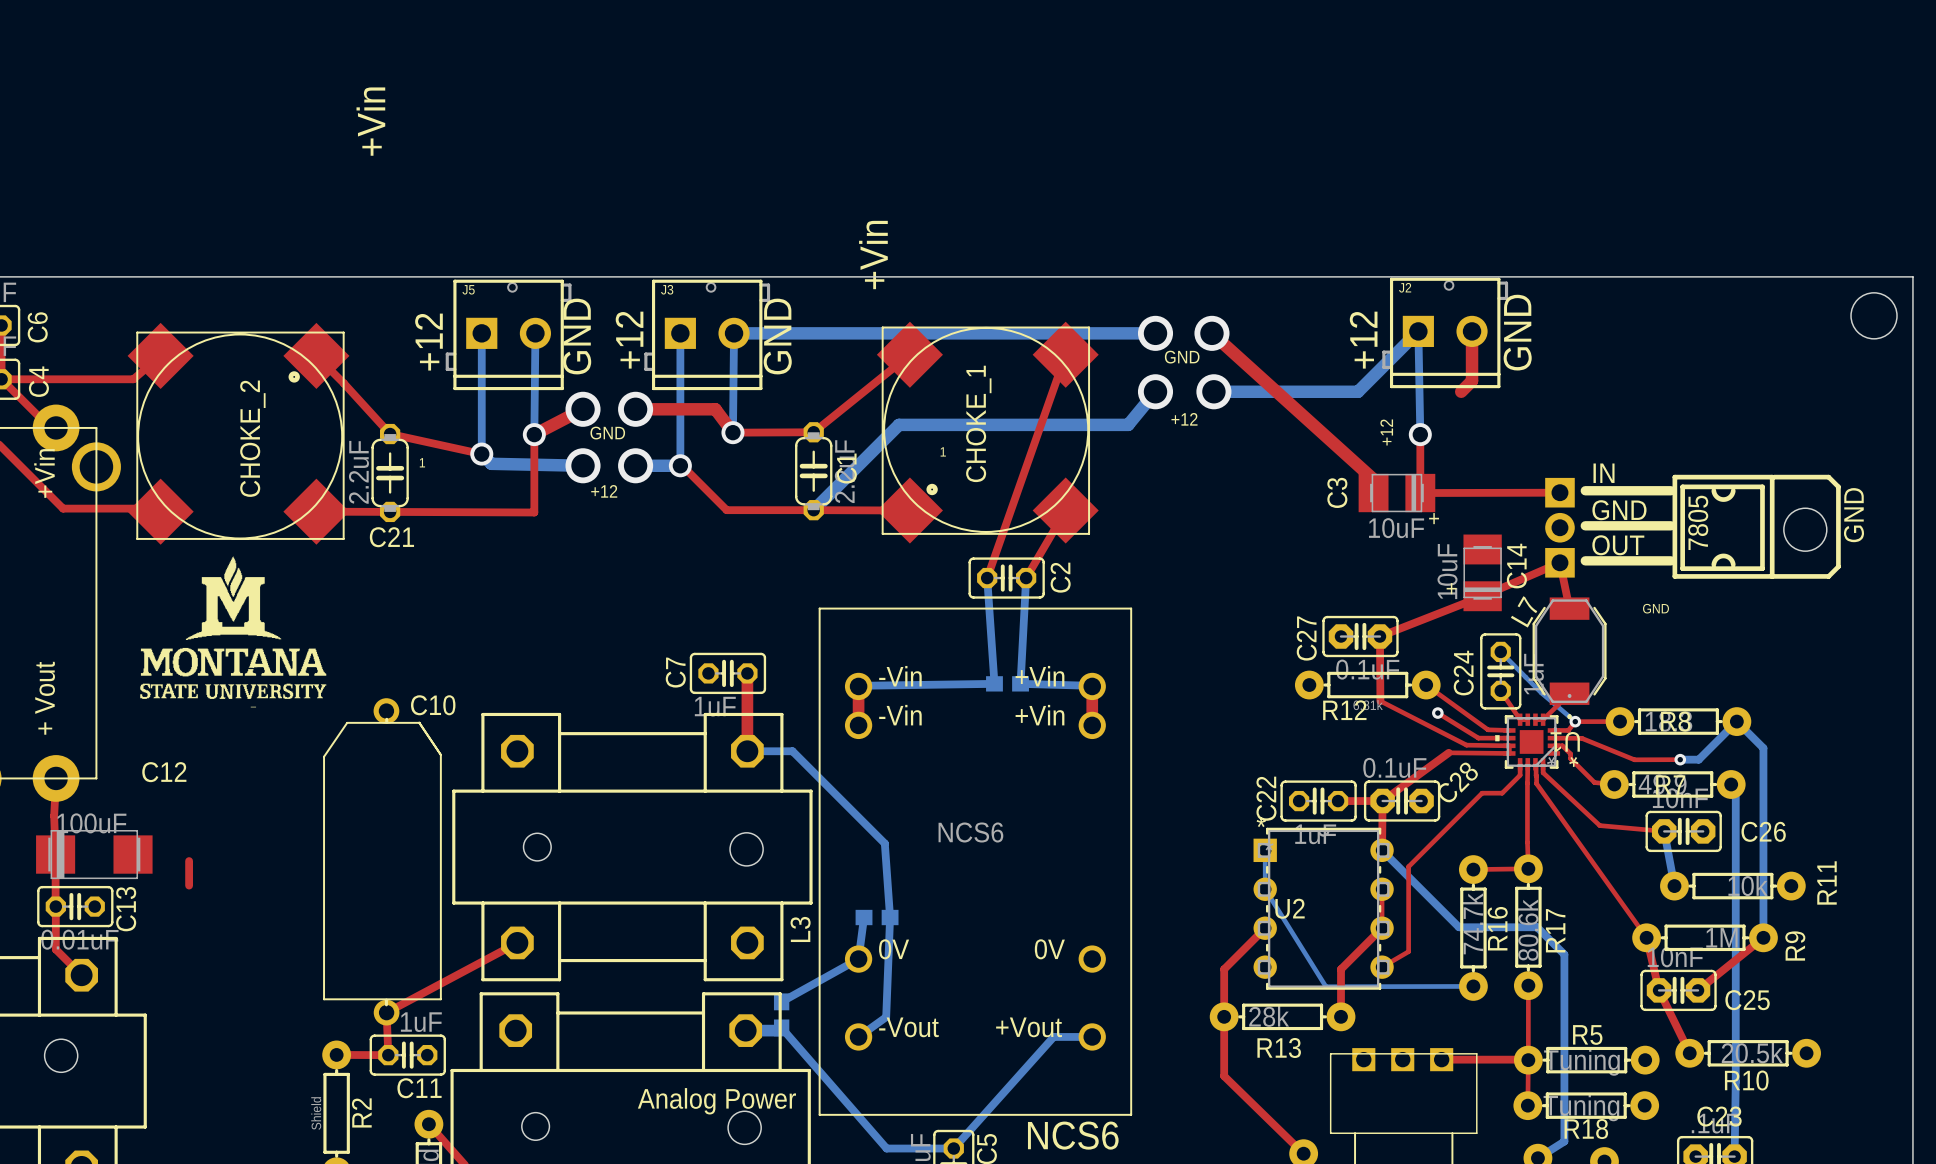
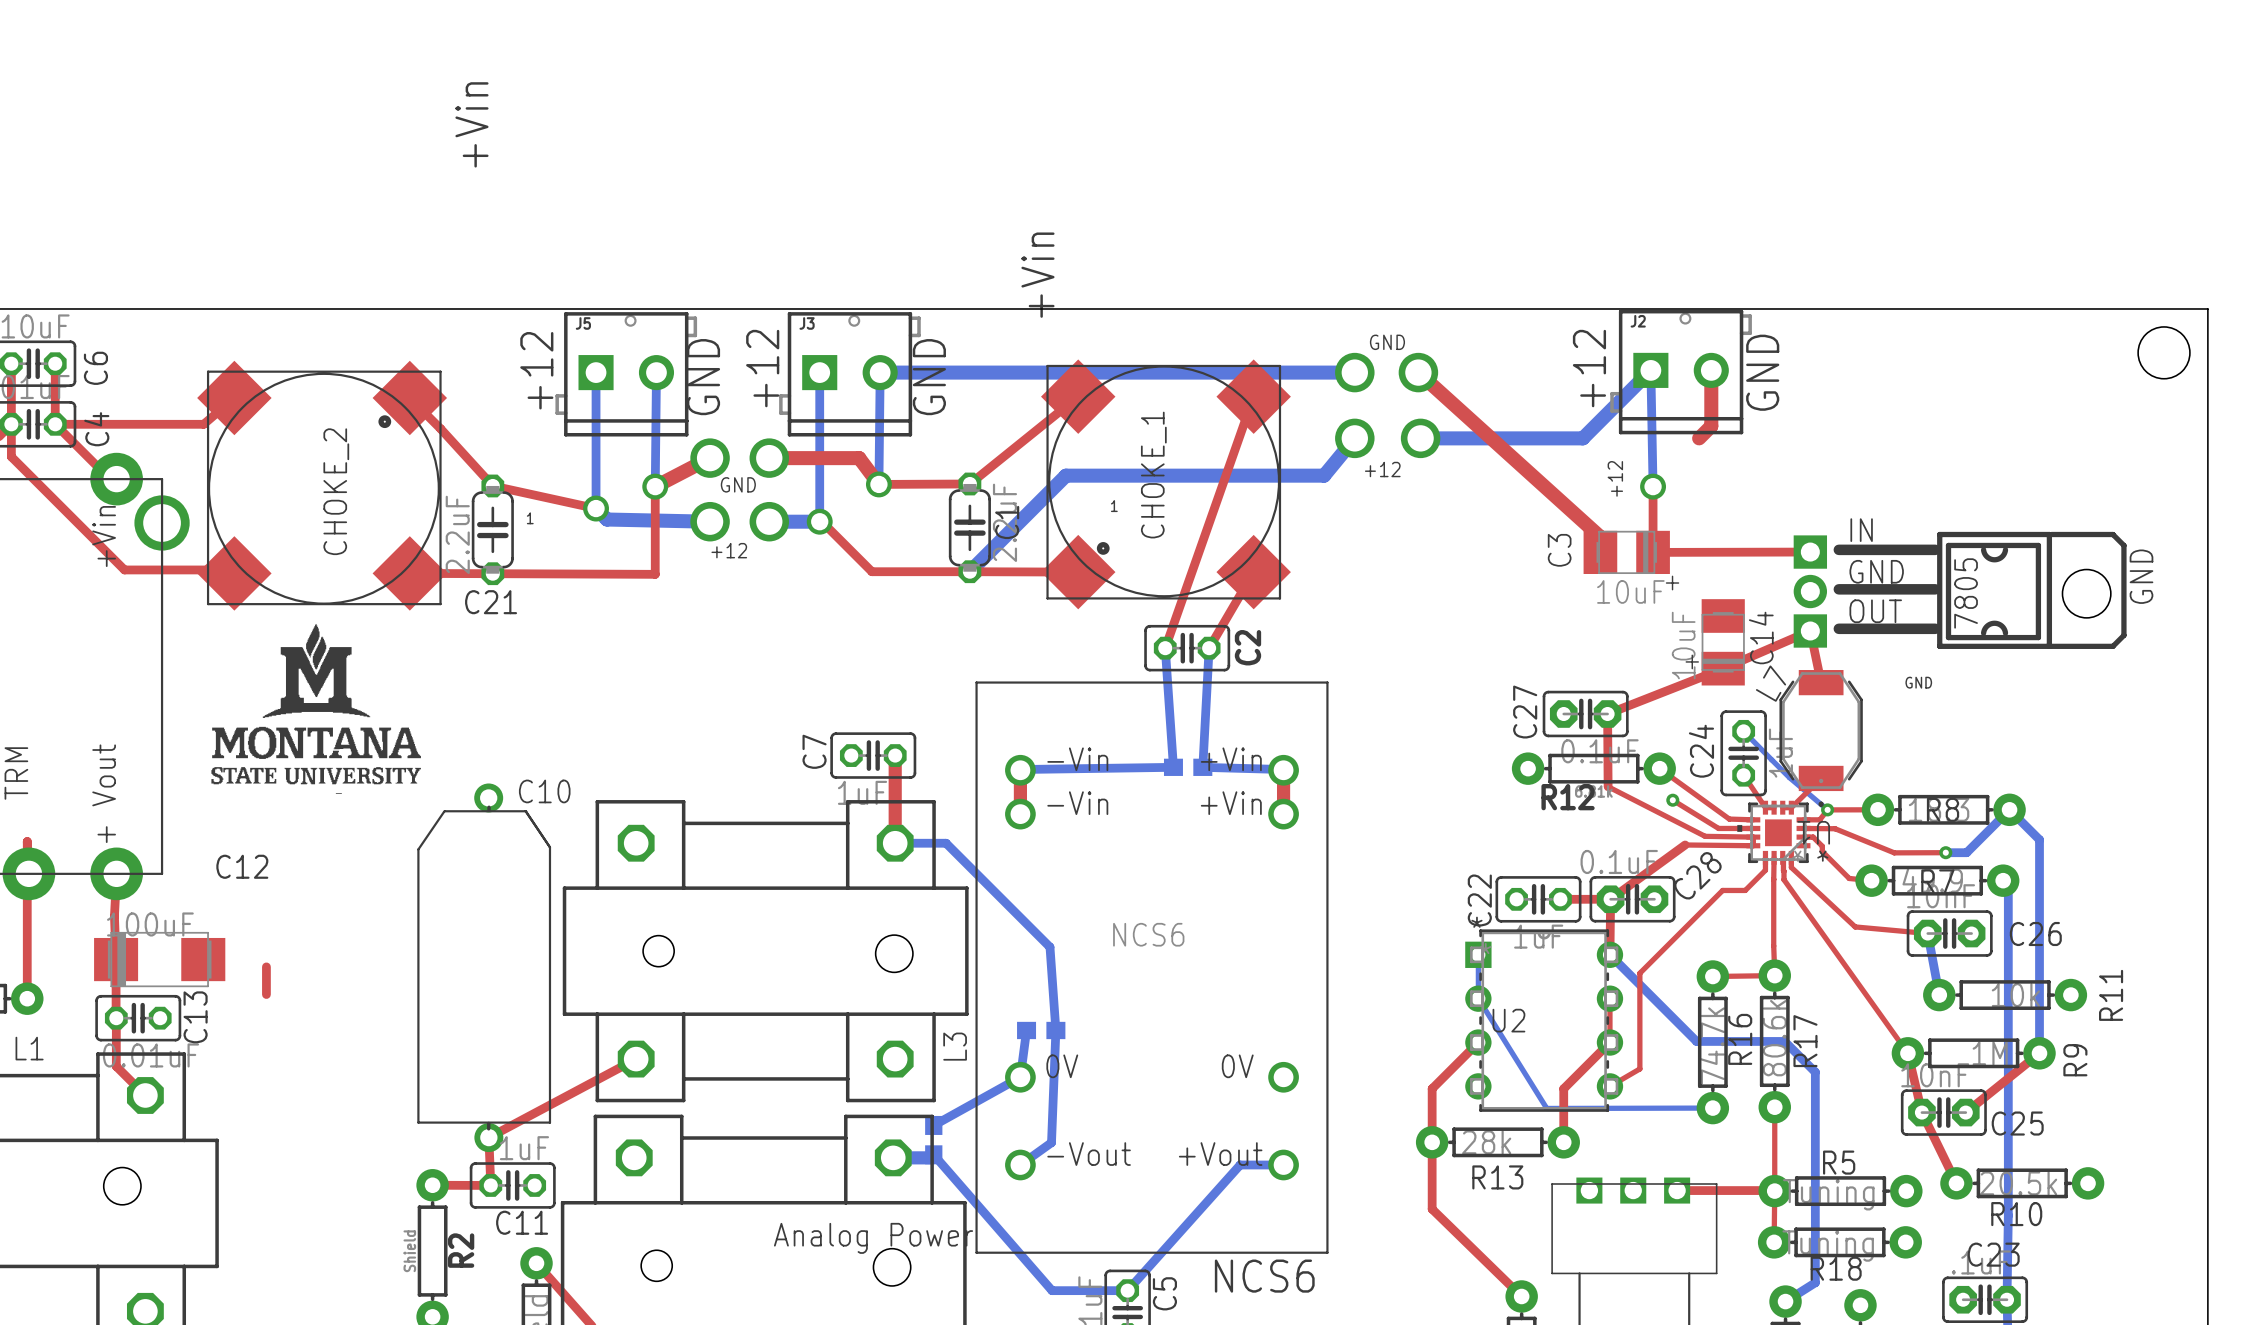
text position: GND (1182, 357) -> GND (1387, 342)

